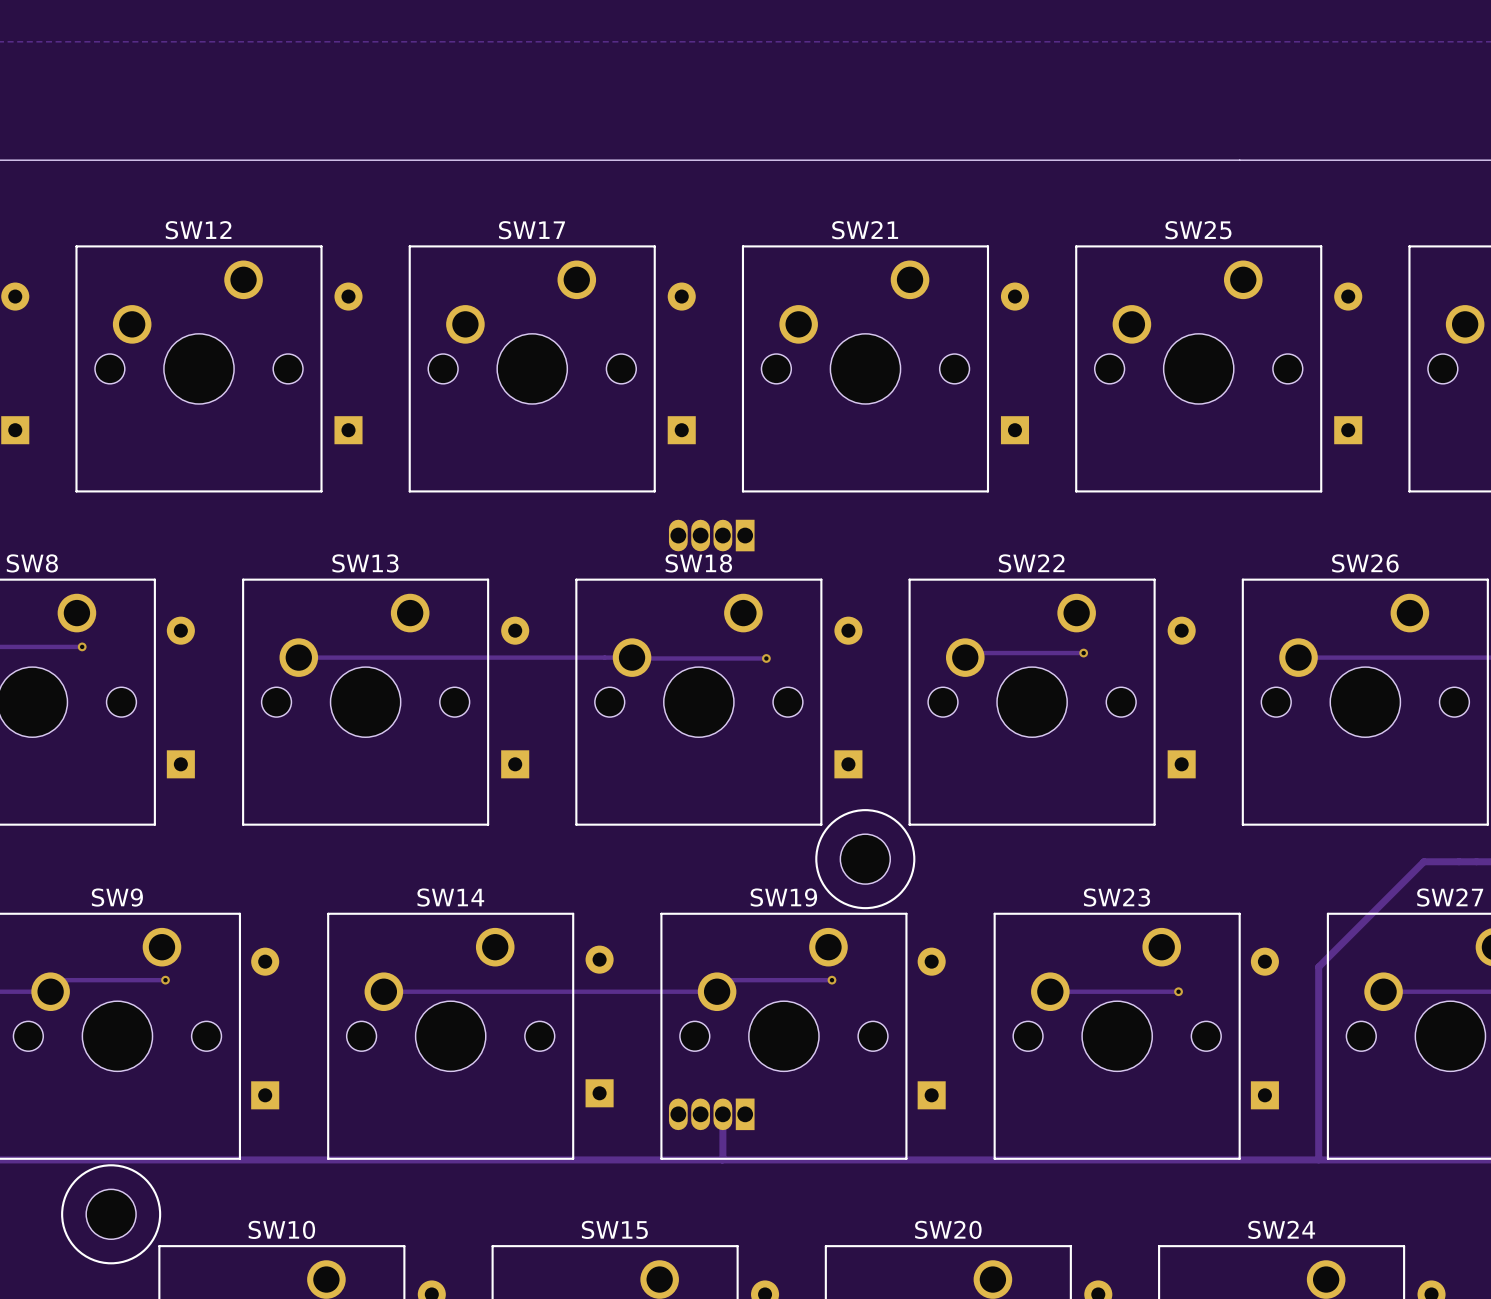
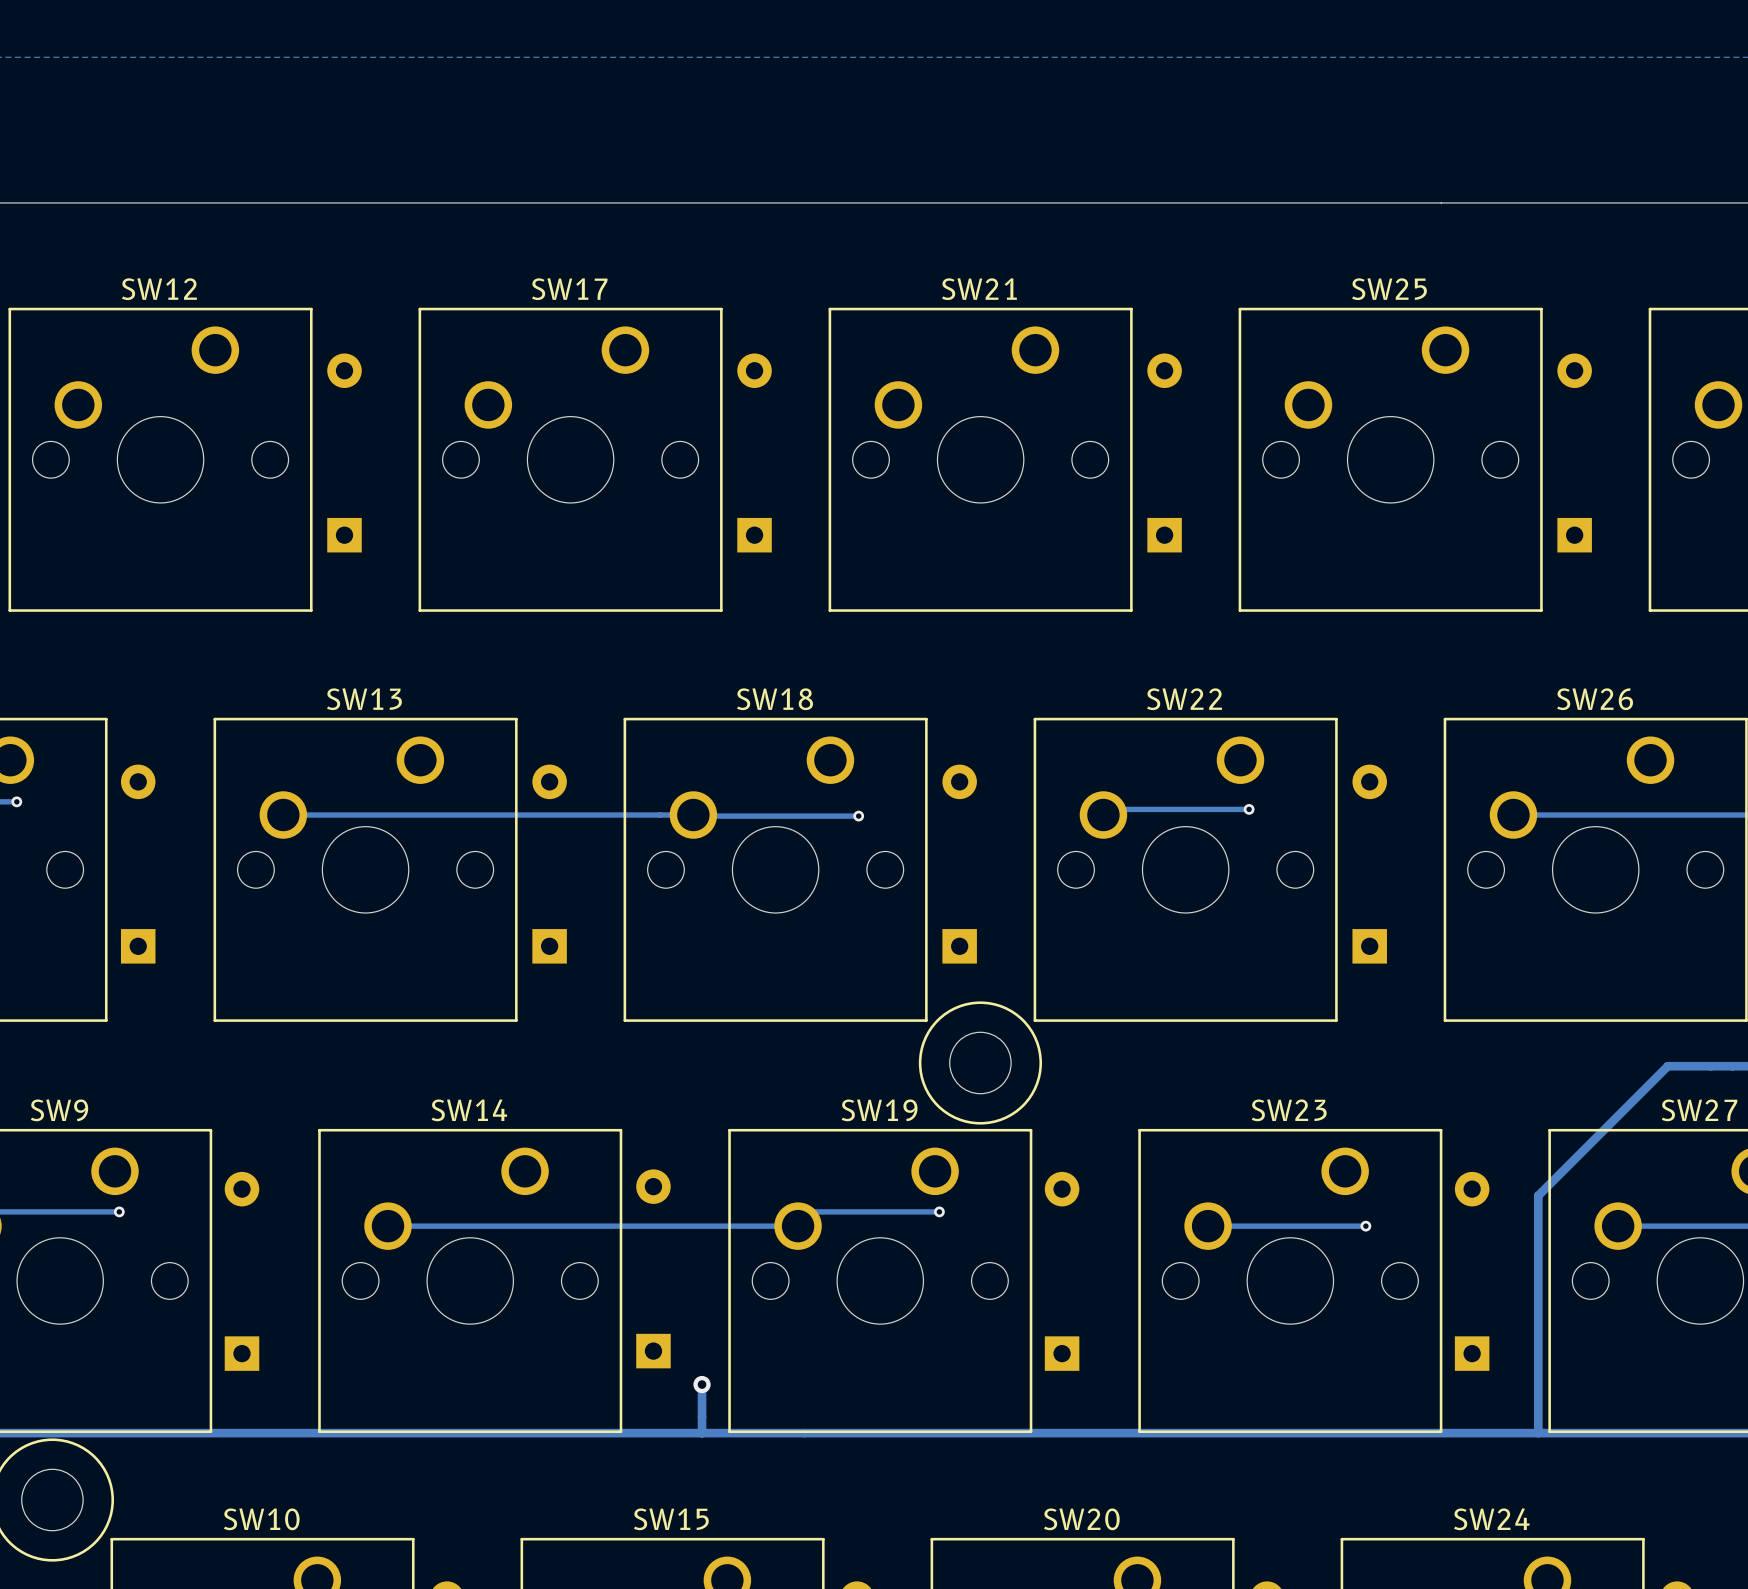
part: (711, 535) -> none
part: (711, 1114) -> none
track: (722, 1114) (722, 1159) -> none
track: none -> (702, 1384) (702, 1433)
via: none -> (702, 1384)

